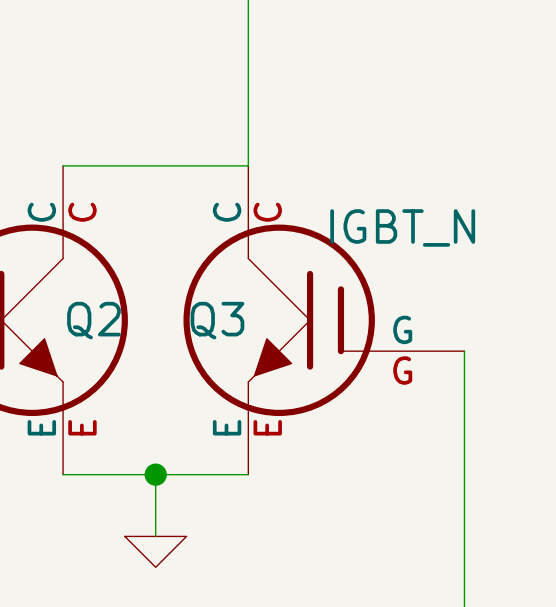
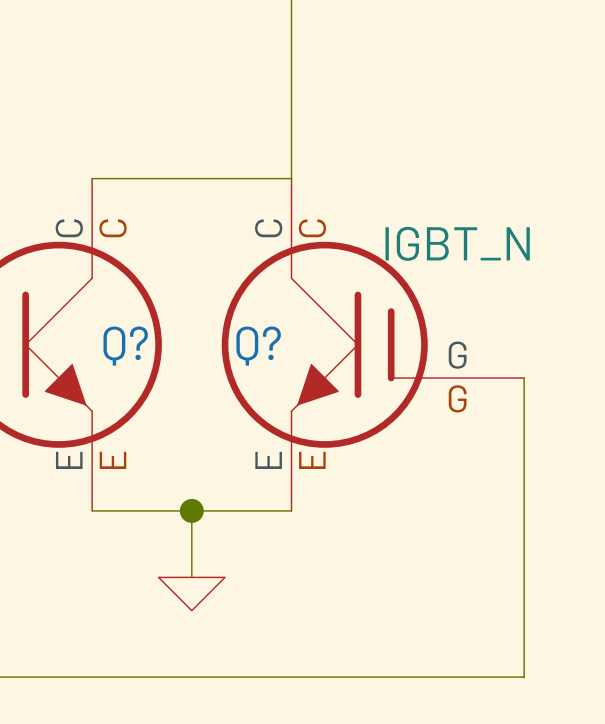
Q2 name: Q2 (93, 320) -> Q? (125, 346)
Q3 name: Q3 (217, 320) -> Q? (258, 346)

